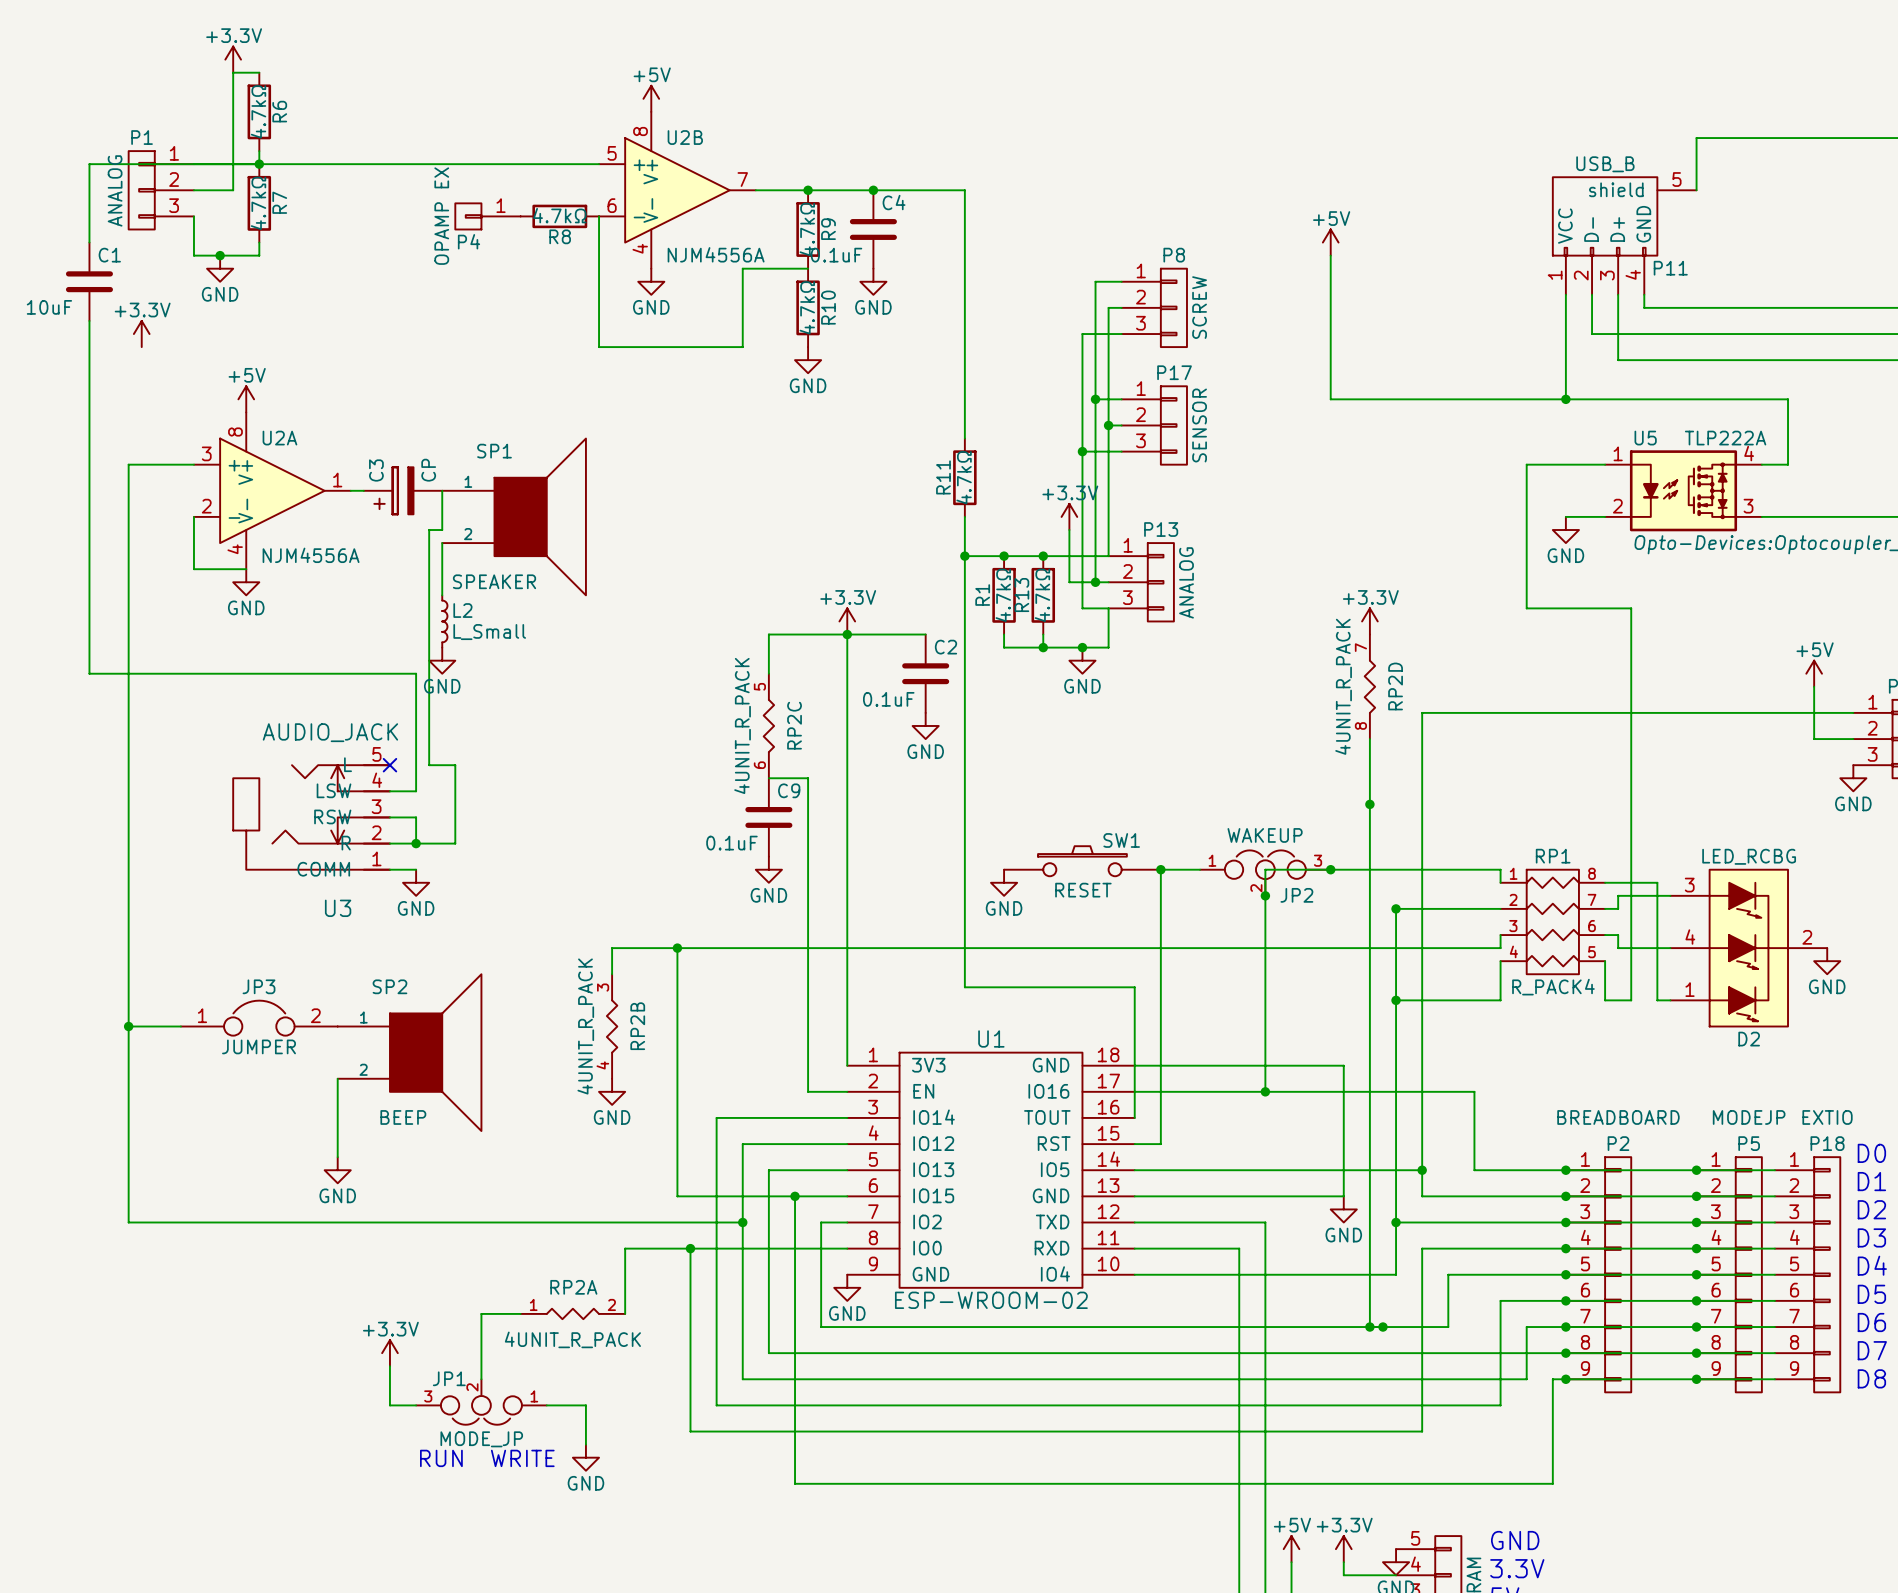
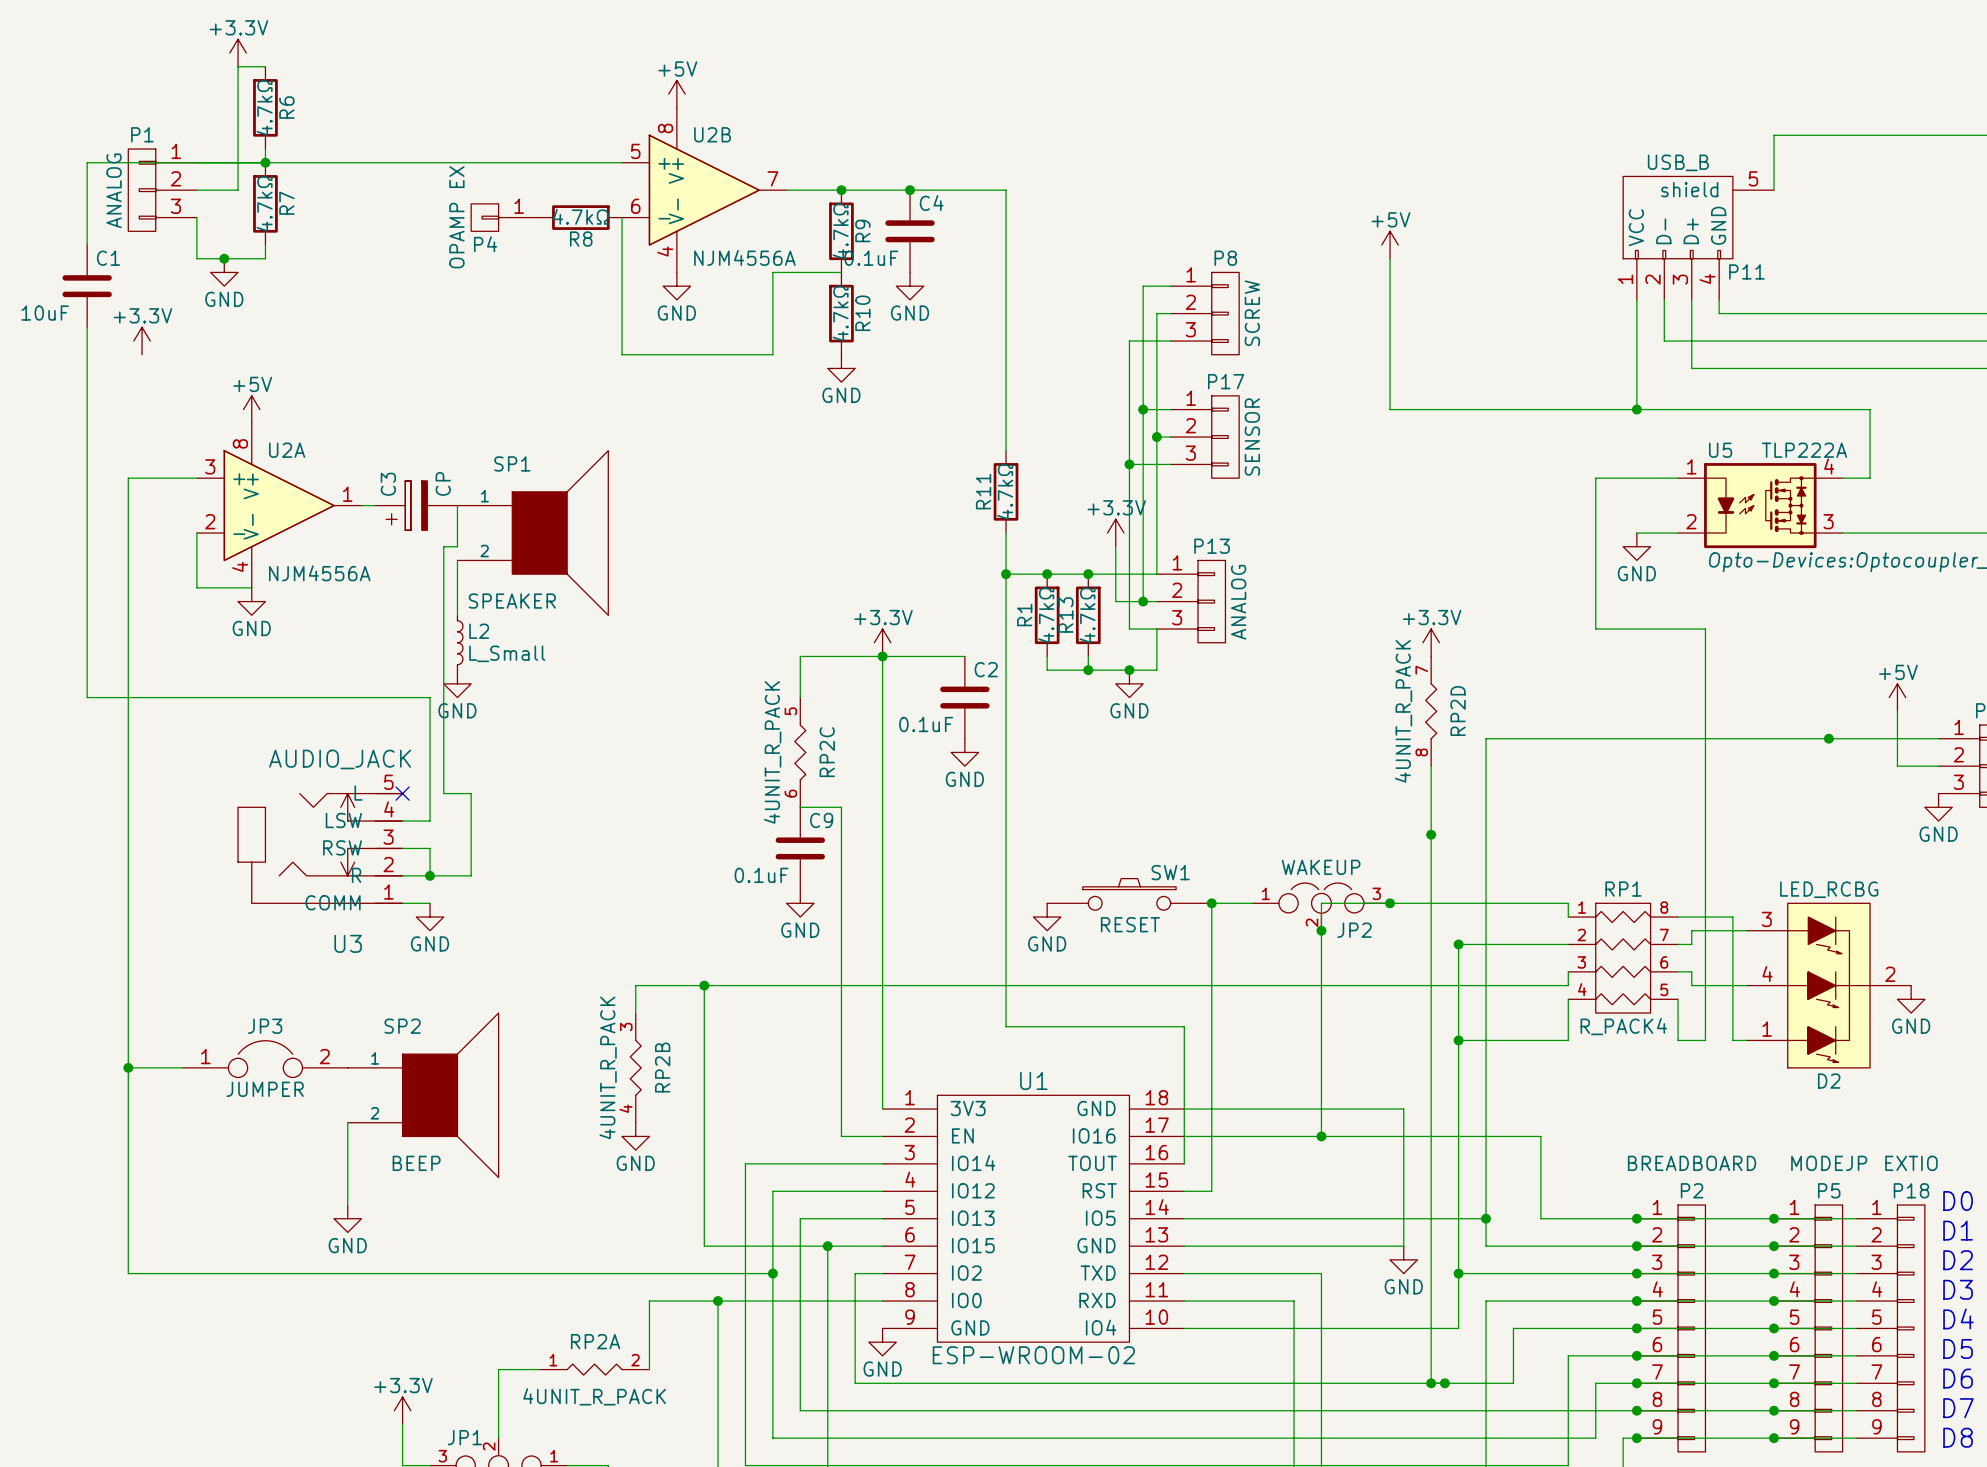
junction: none -> (1828, 738)

